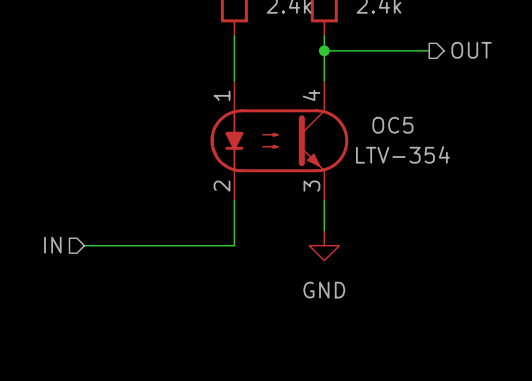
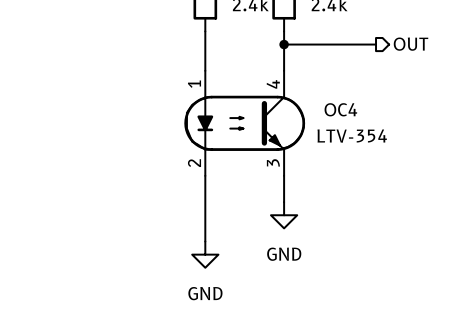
OC5 name: OC5 (392, 125) -> OC4 (340, 109)
hierarchical label: IN (52, 245) -> none
wire: (84, 245) (234, 245) -> (205, 241) (205, 215)
power symbol: none -> GND (205, 254)

